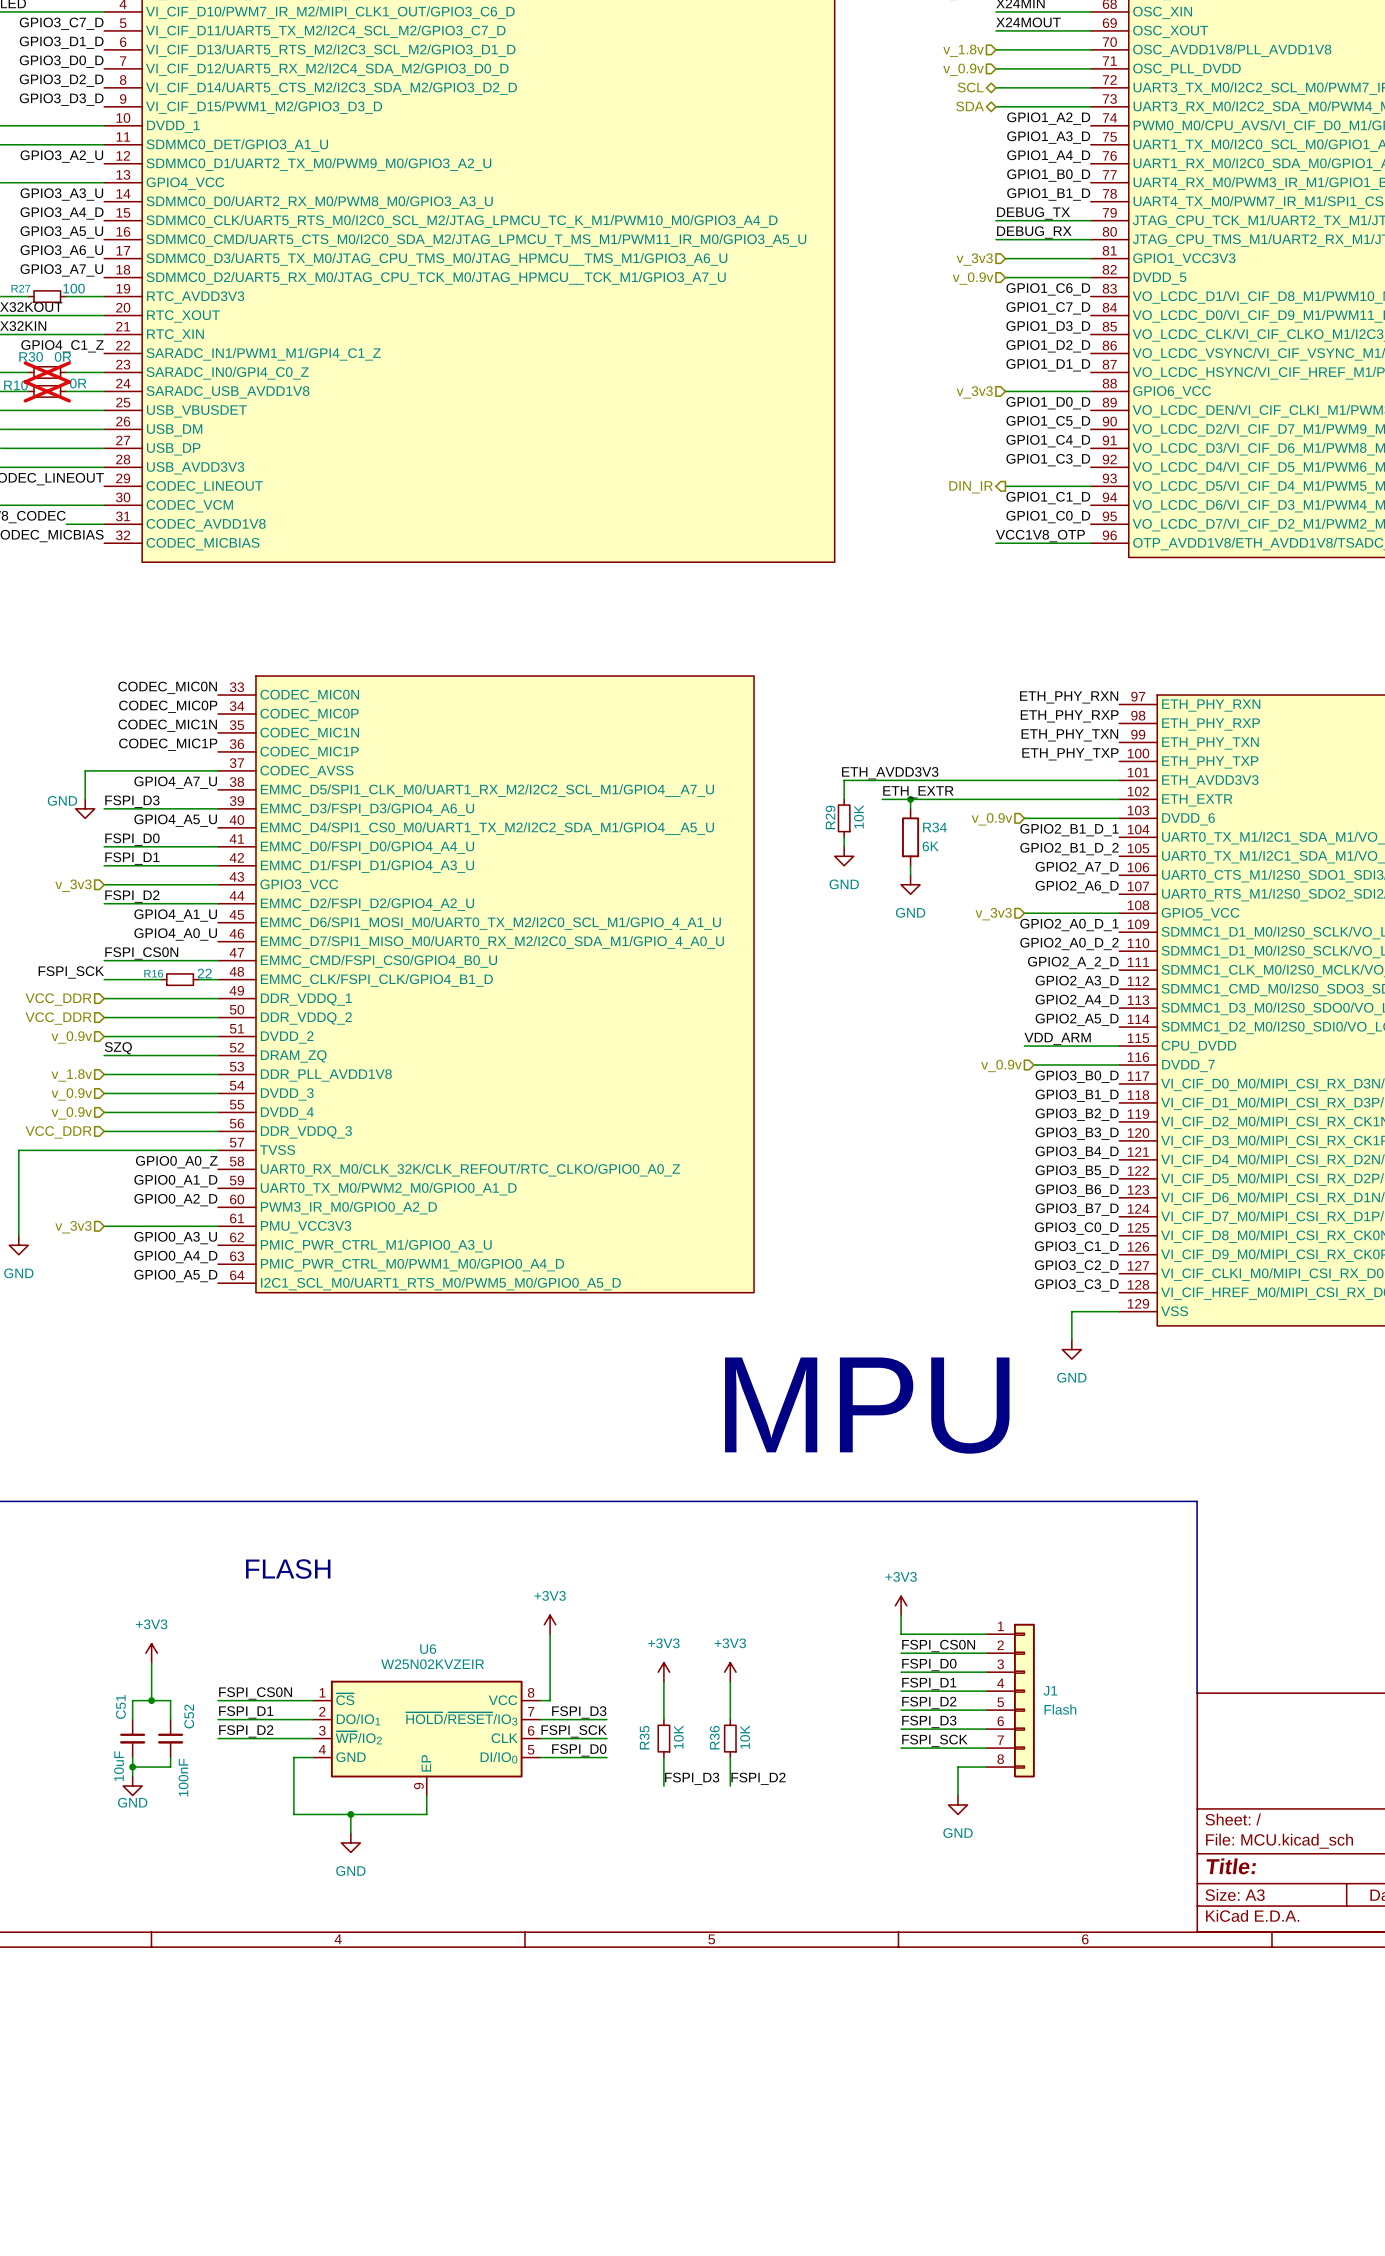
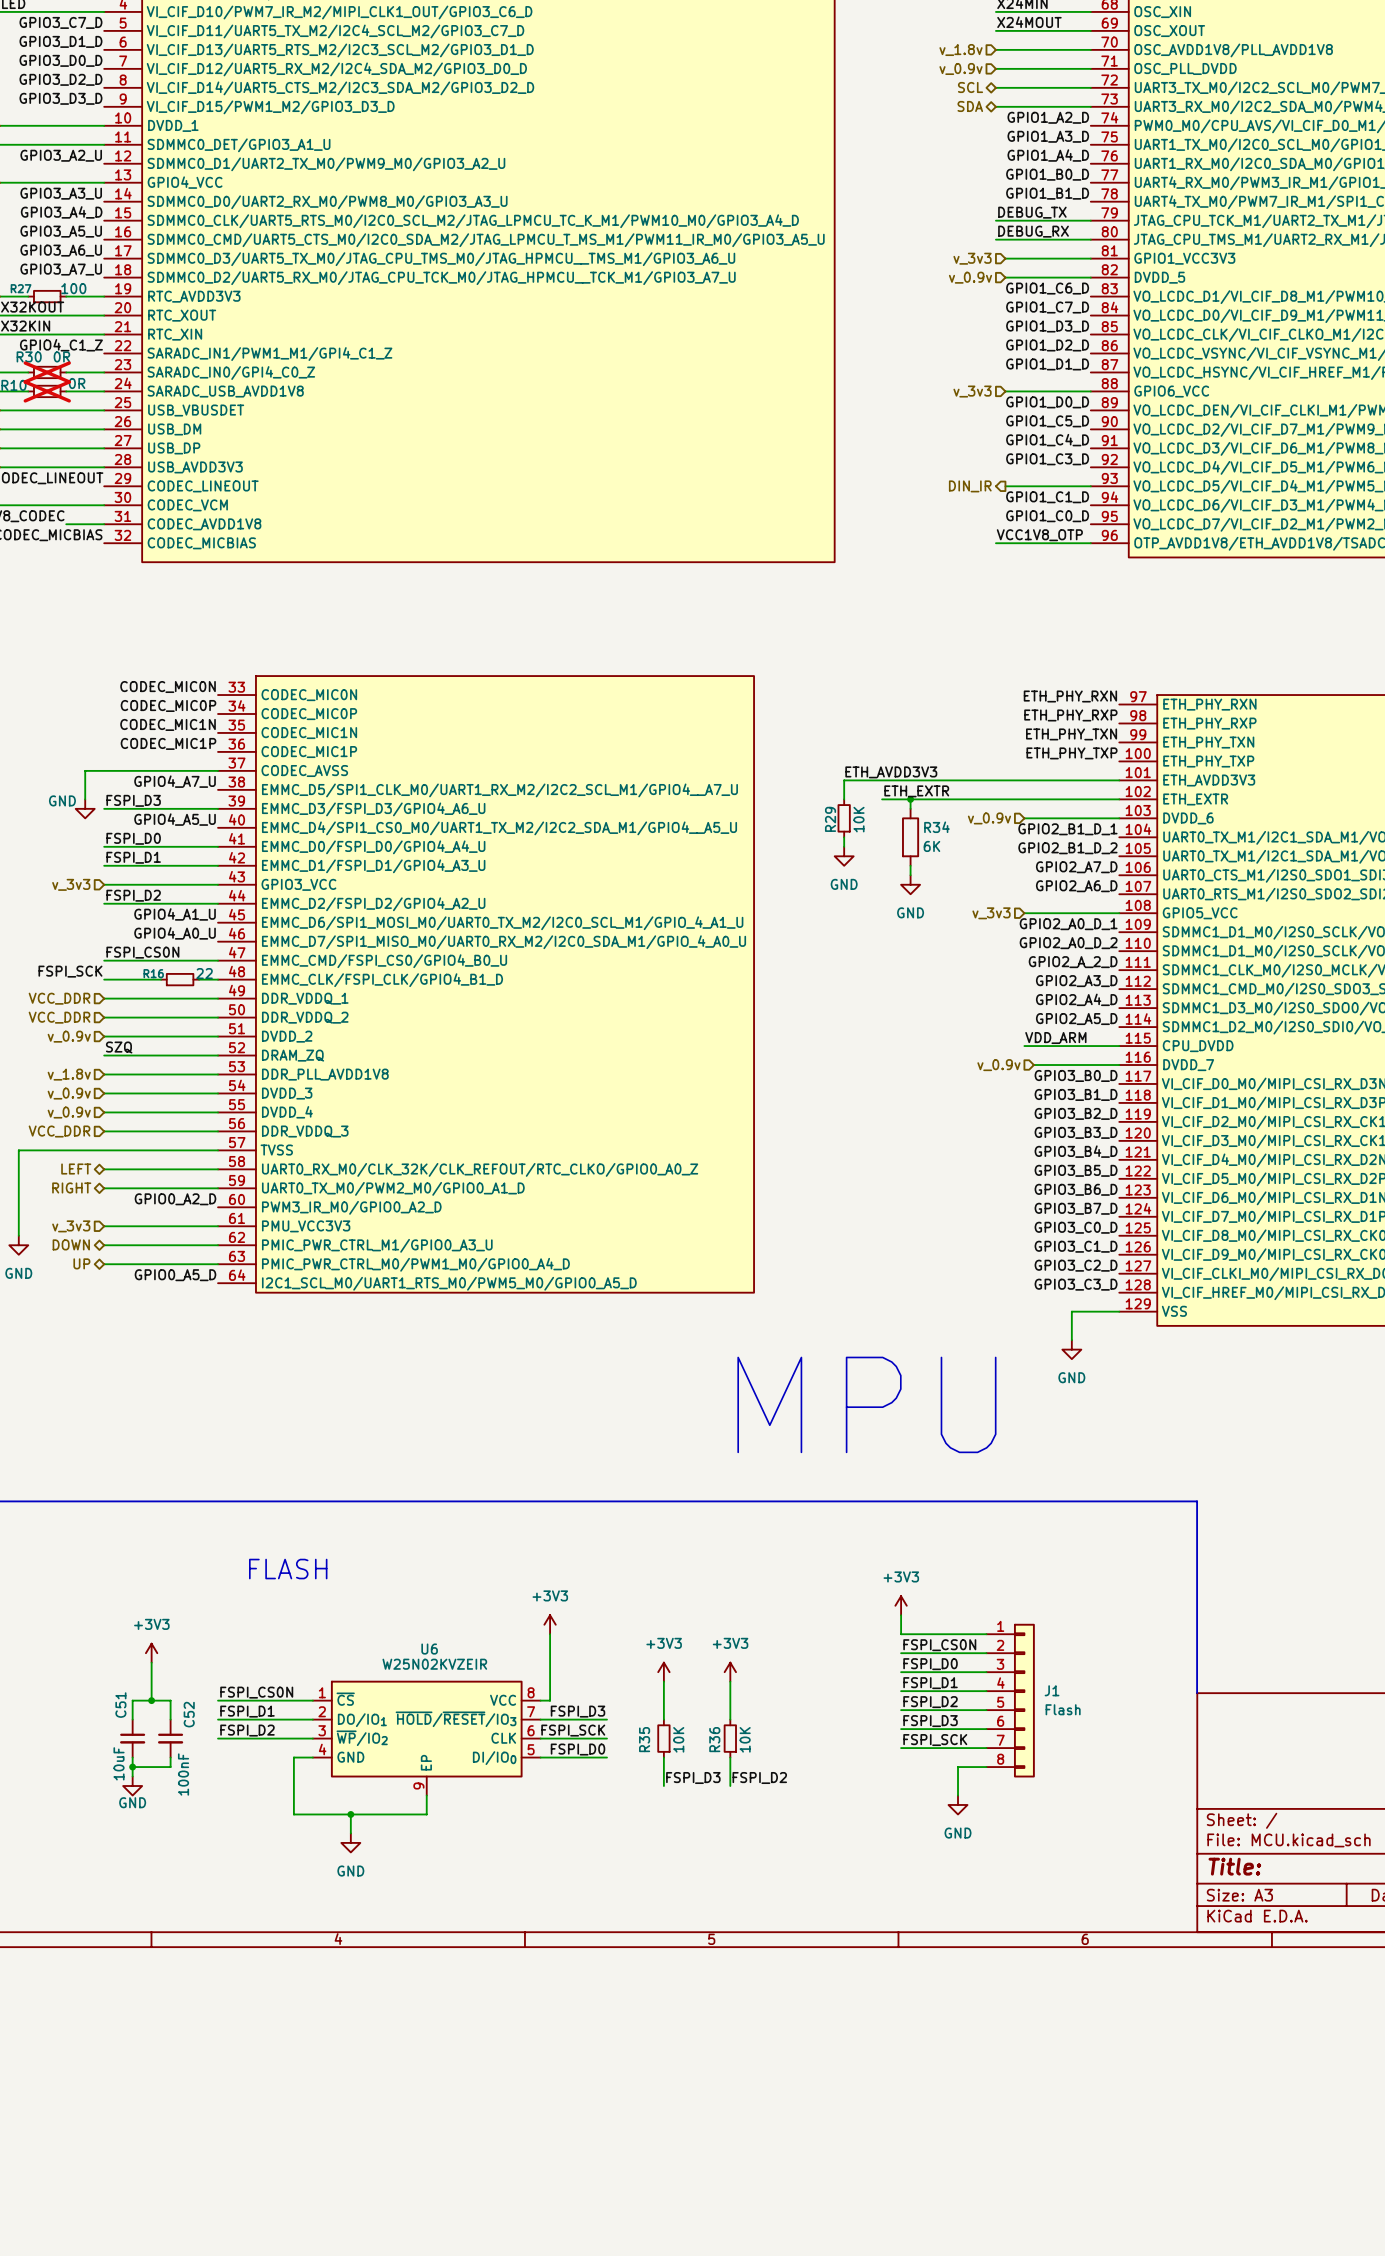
label: GPIO0_A0_Z (176, 1162) -> none
hierarchical label: none -> LEFT (76, 1169)
wire: none -> (104, 1169) (218, 1169)
label: GPIO0_A1_D (175, 1181) -> none
hierarchical label: none -> RIGHT (71, 1187)
wire: none -> (104, 1188) (218, 1188)
label: GPIO0_A3_U (175, 1238) -> none
hierarchical label: none -> DOWN (71, 1244)
wire: none -> (104, 1245) (218, 1245)
label: GPIO0_A4_D (175, 1257) -> none
hierarchical label: none -> UP (81, 1263)
wire: none -> (104, 1264) (218, 1264)

